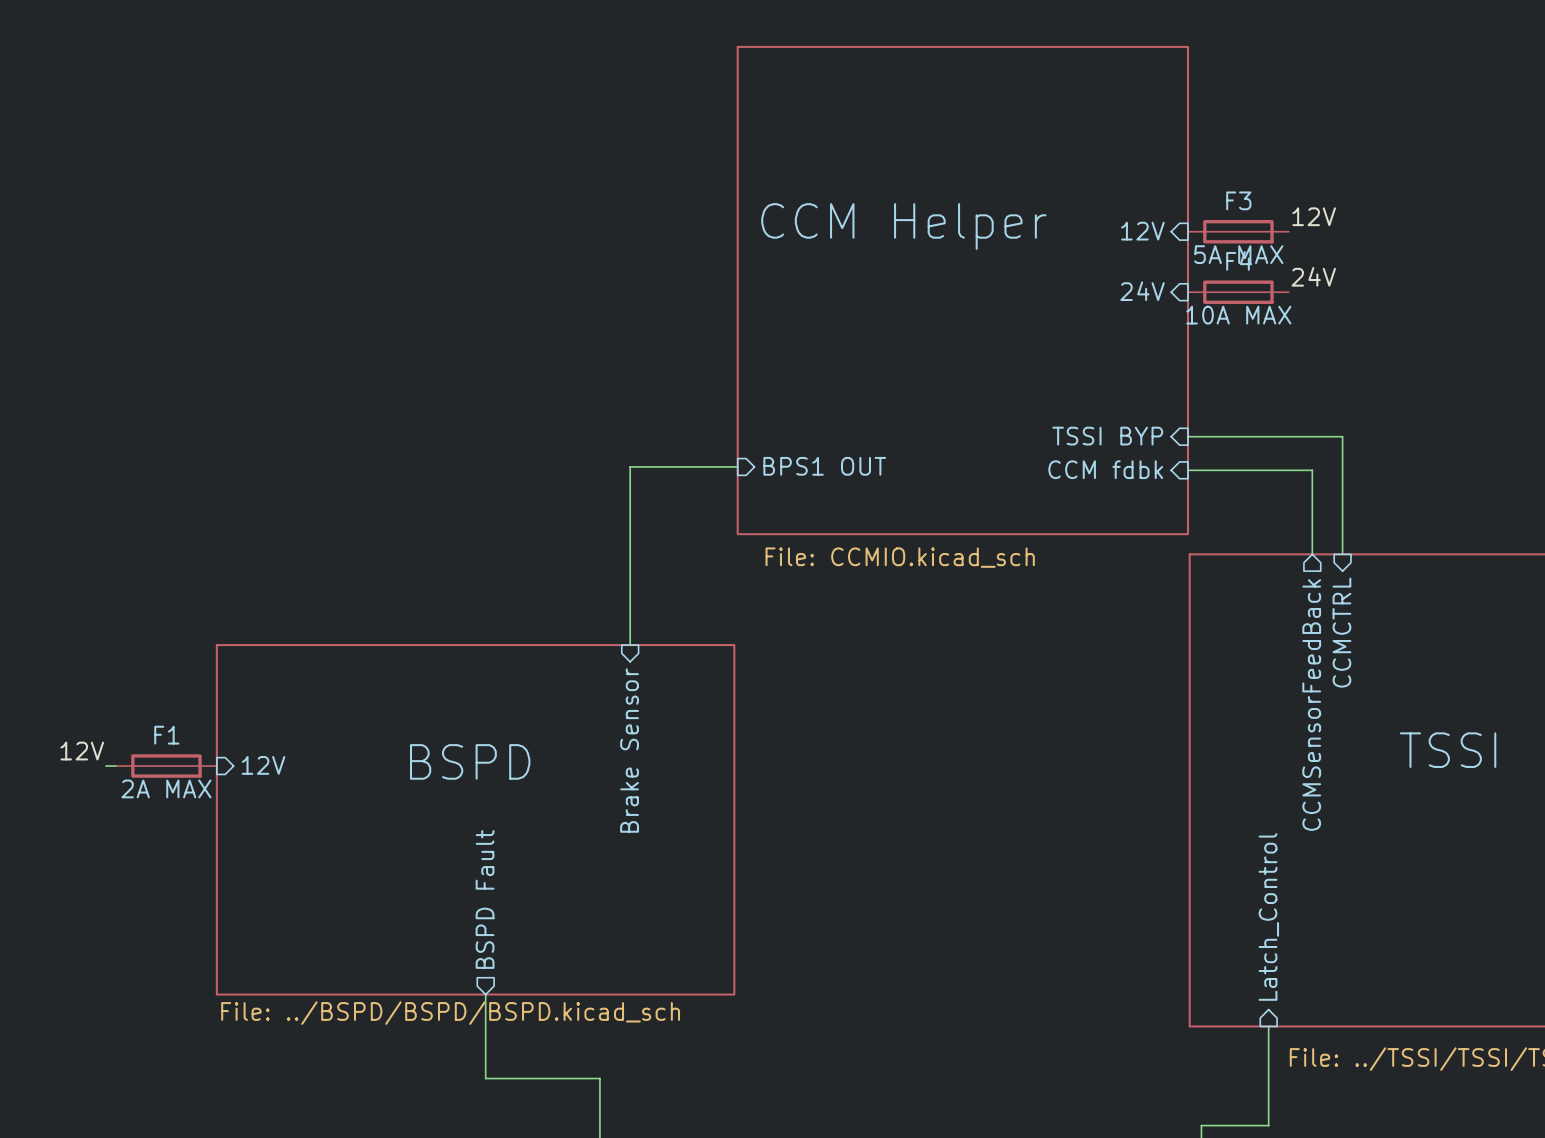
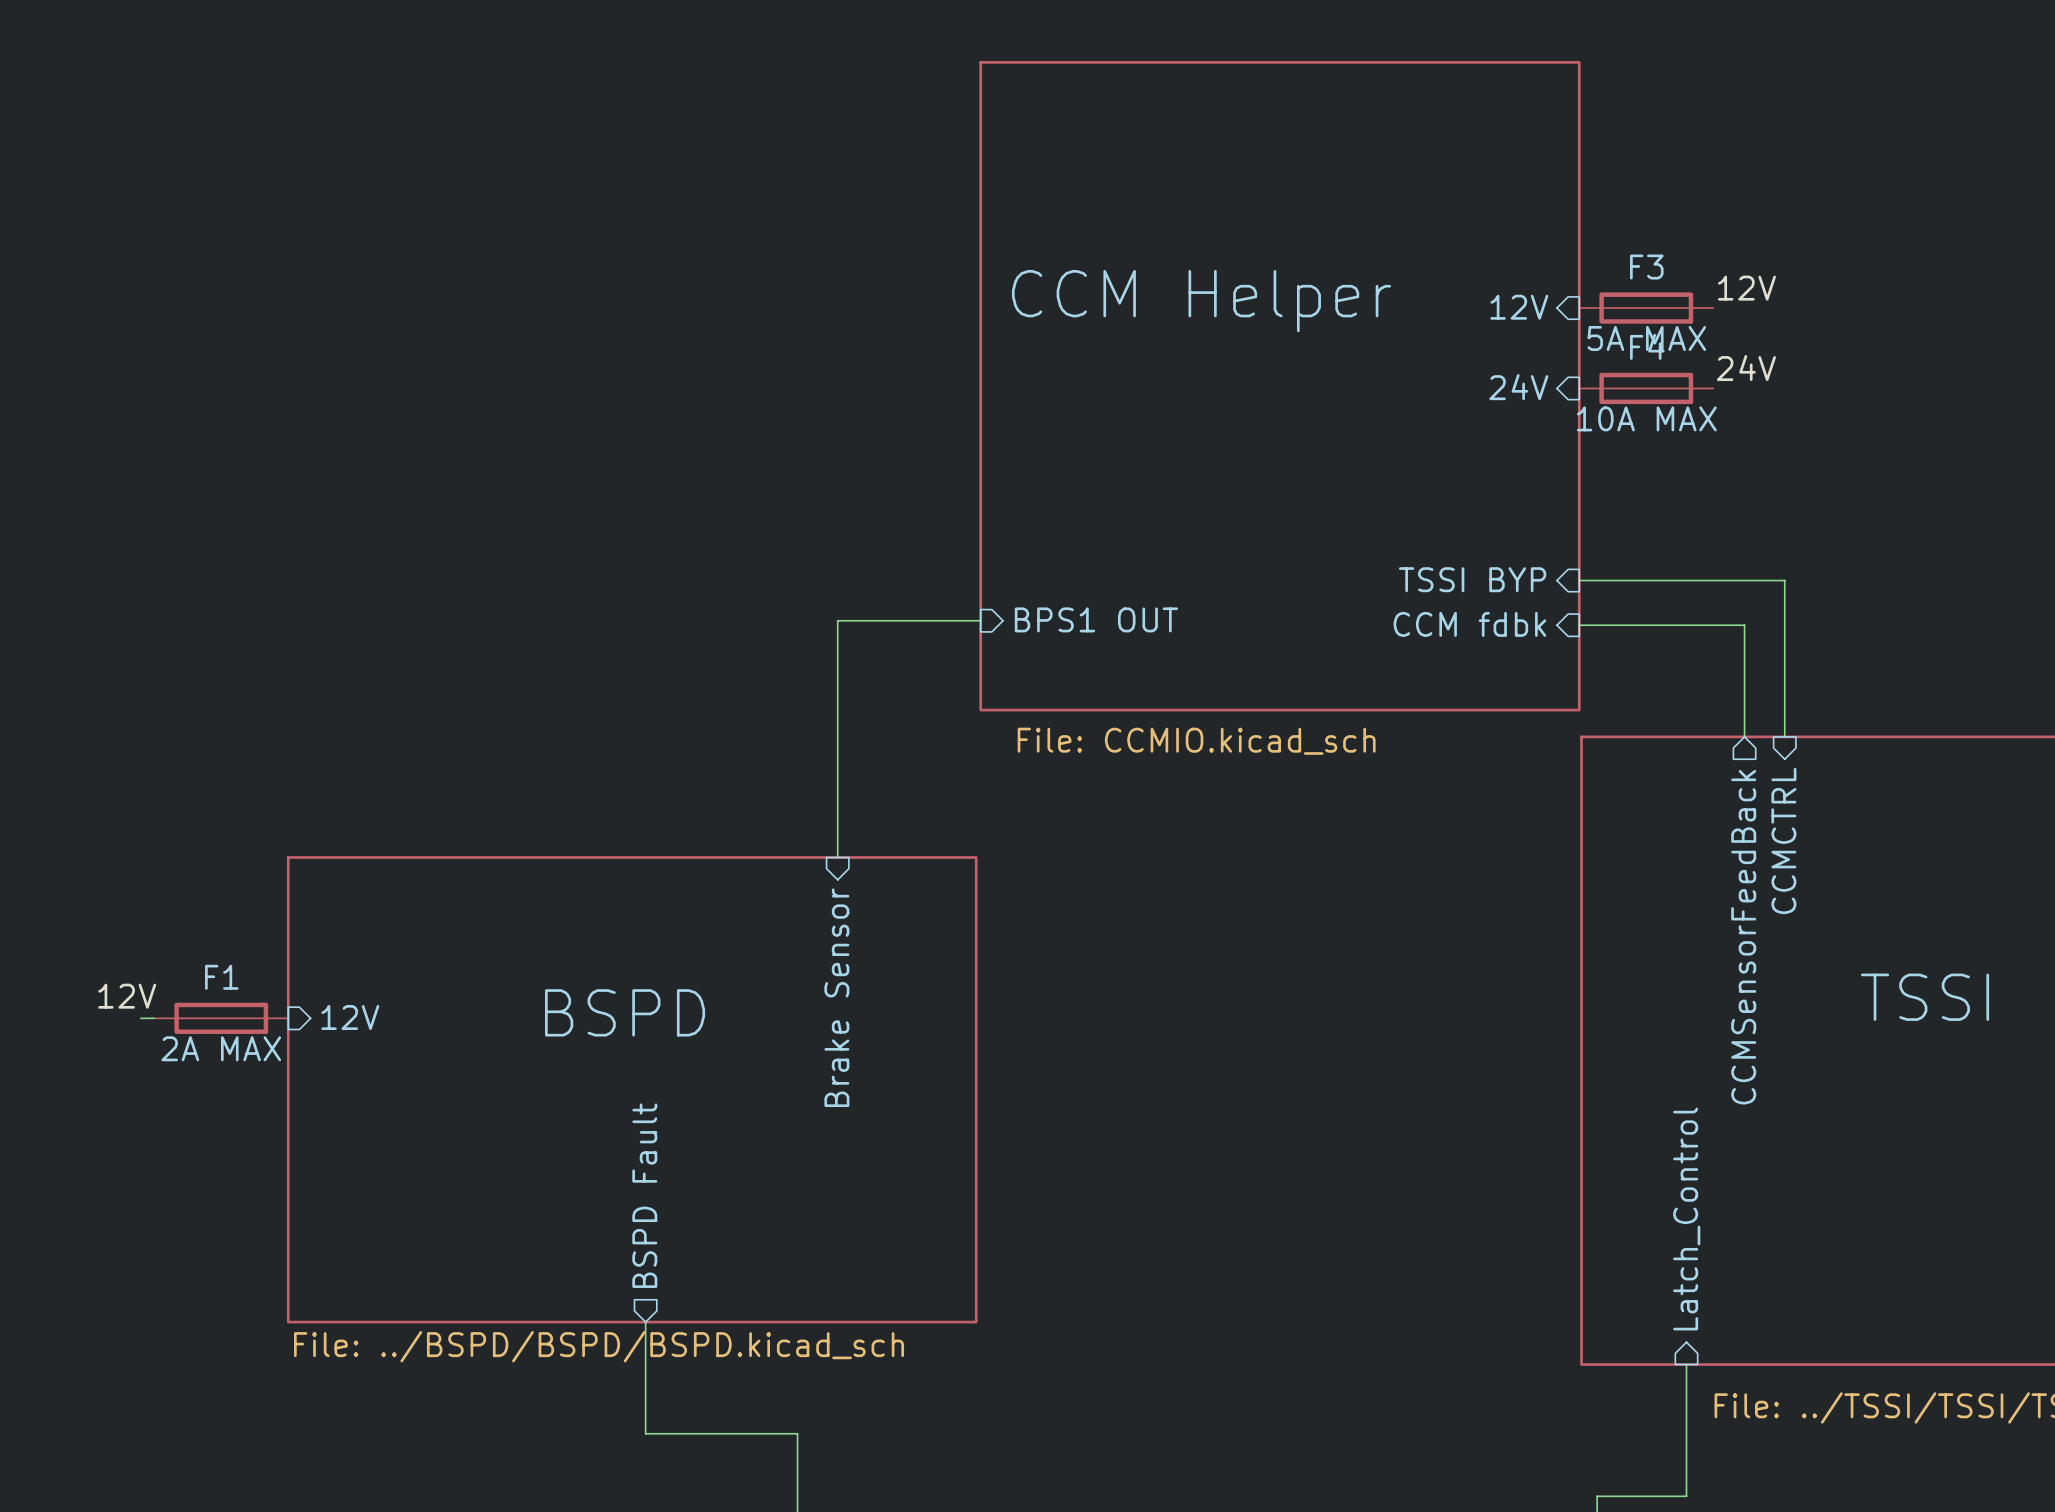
label position: 12V (82, 751) -> 12V (127, 996)

